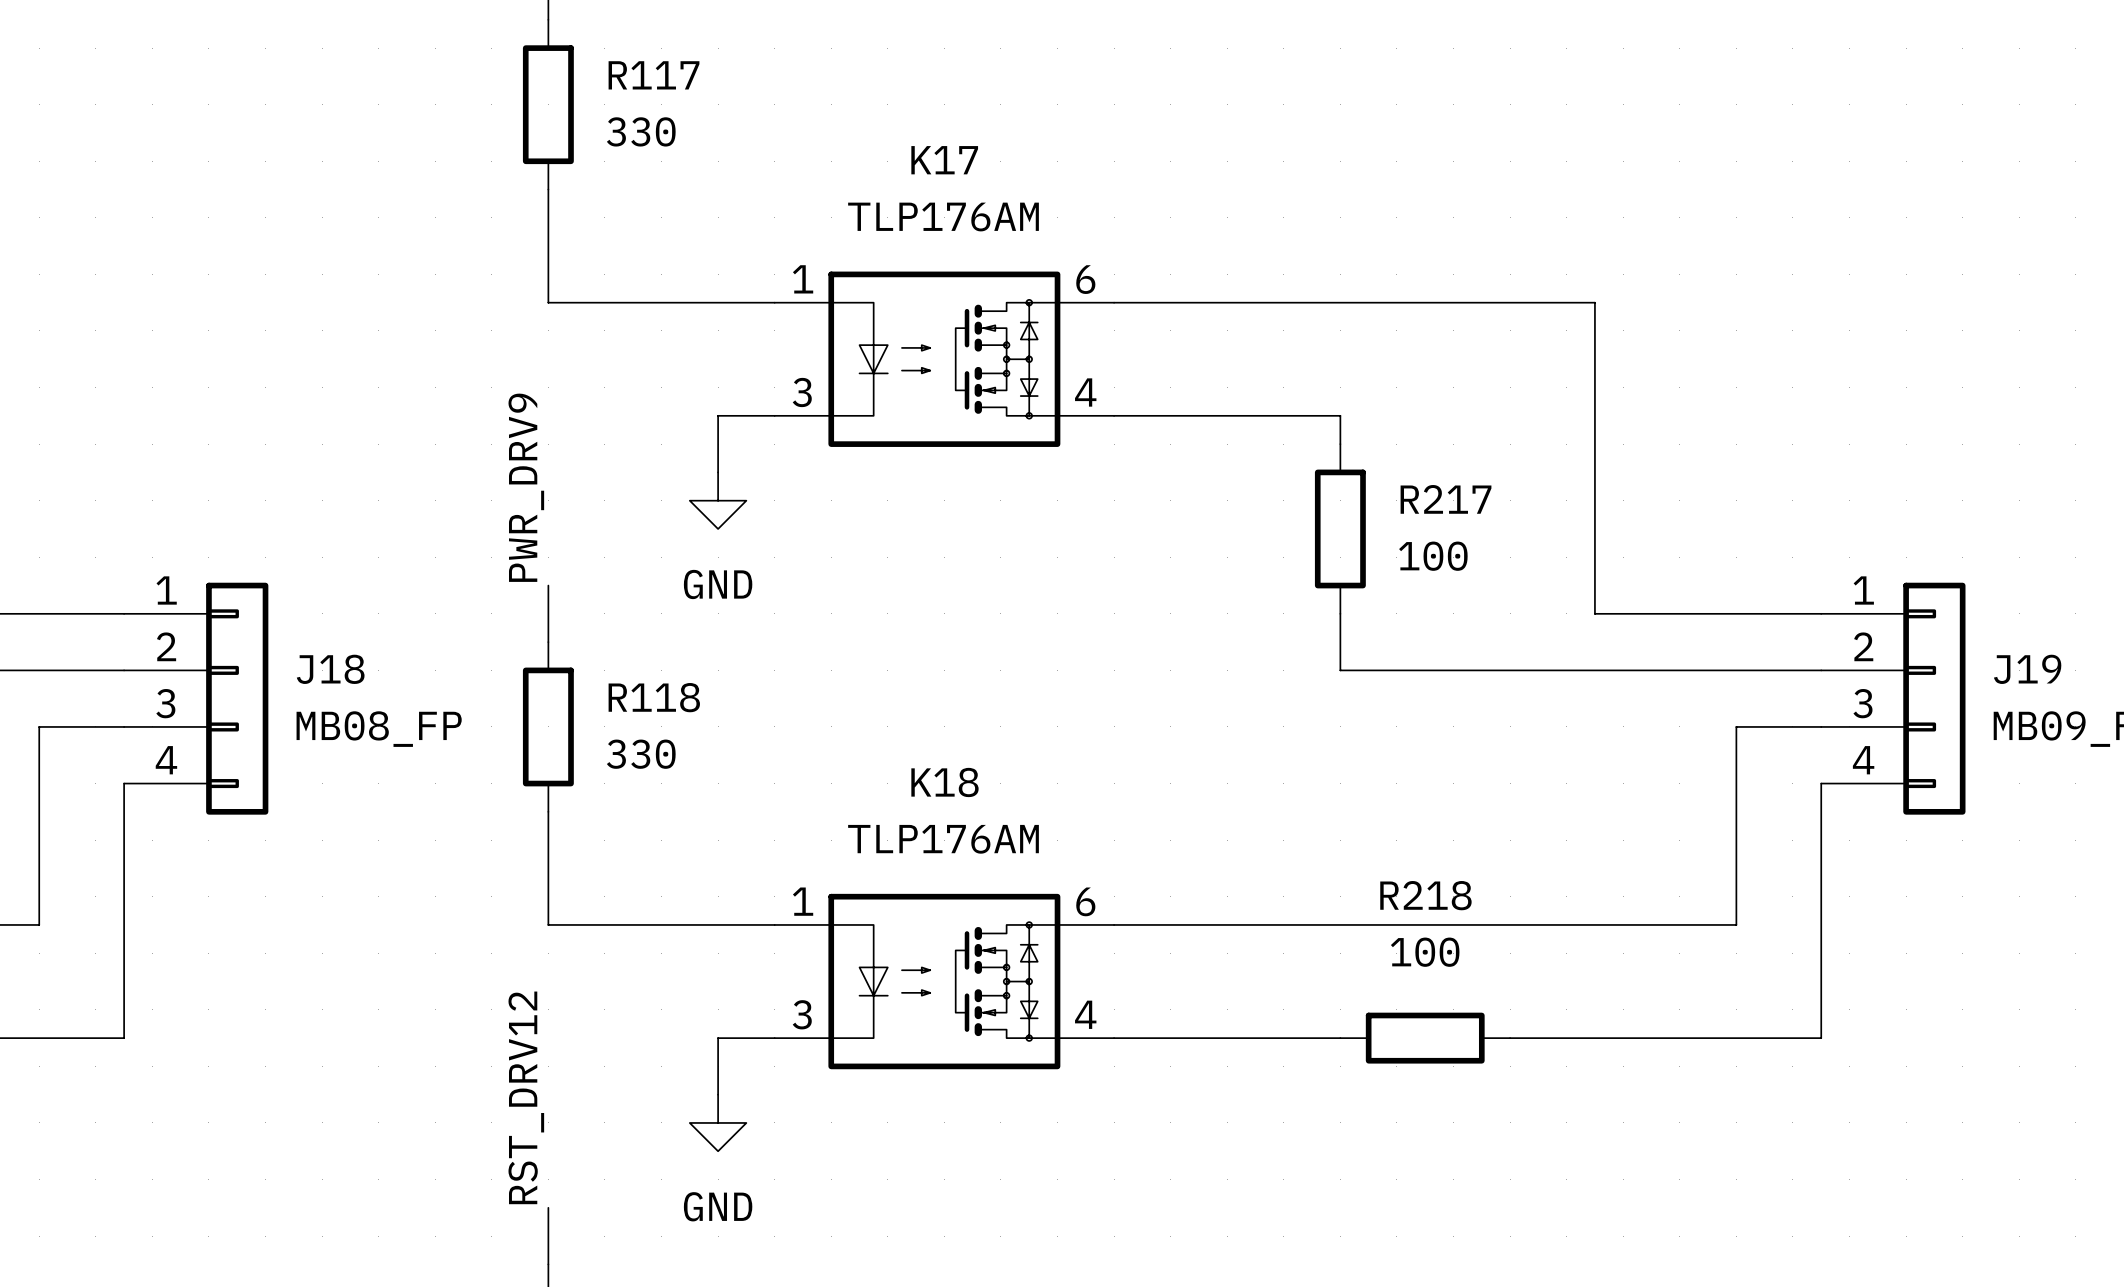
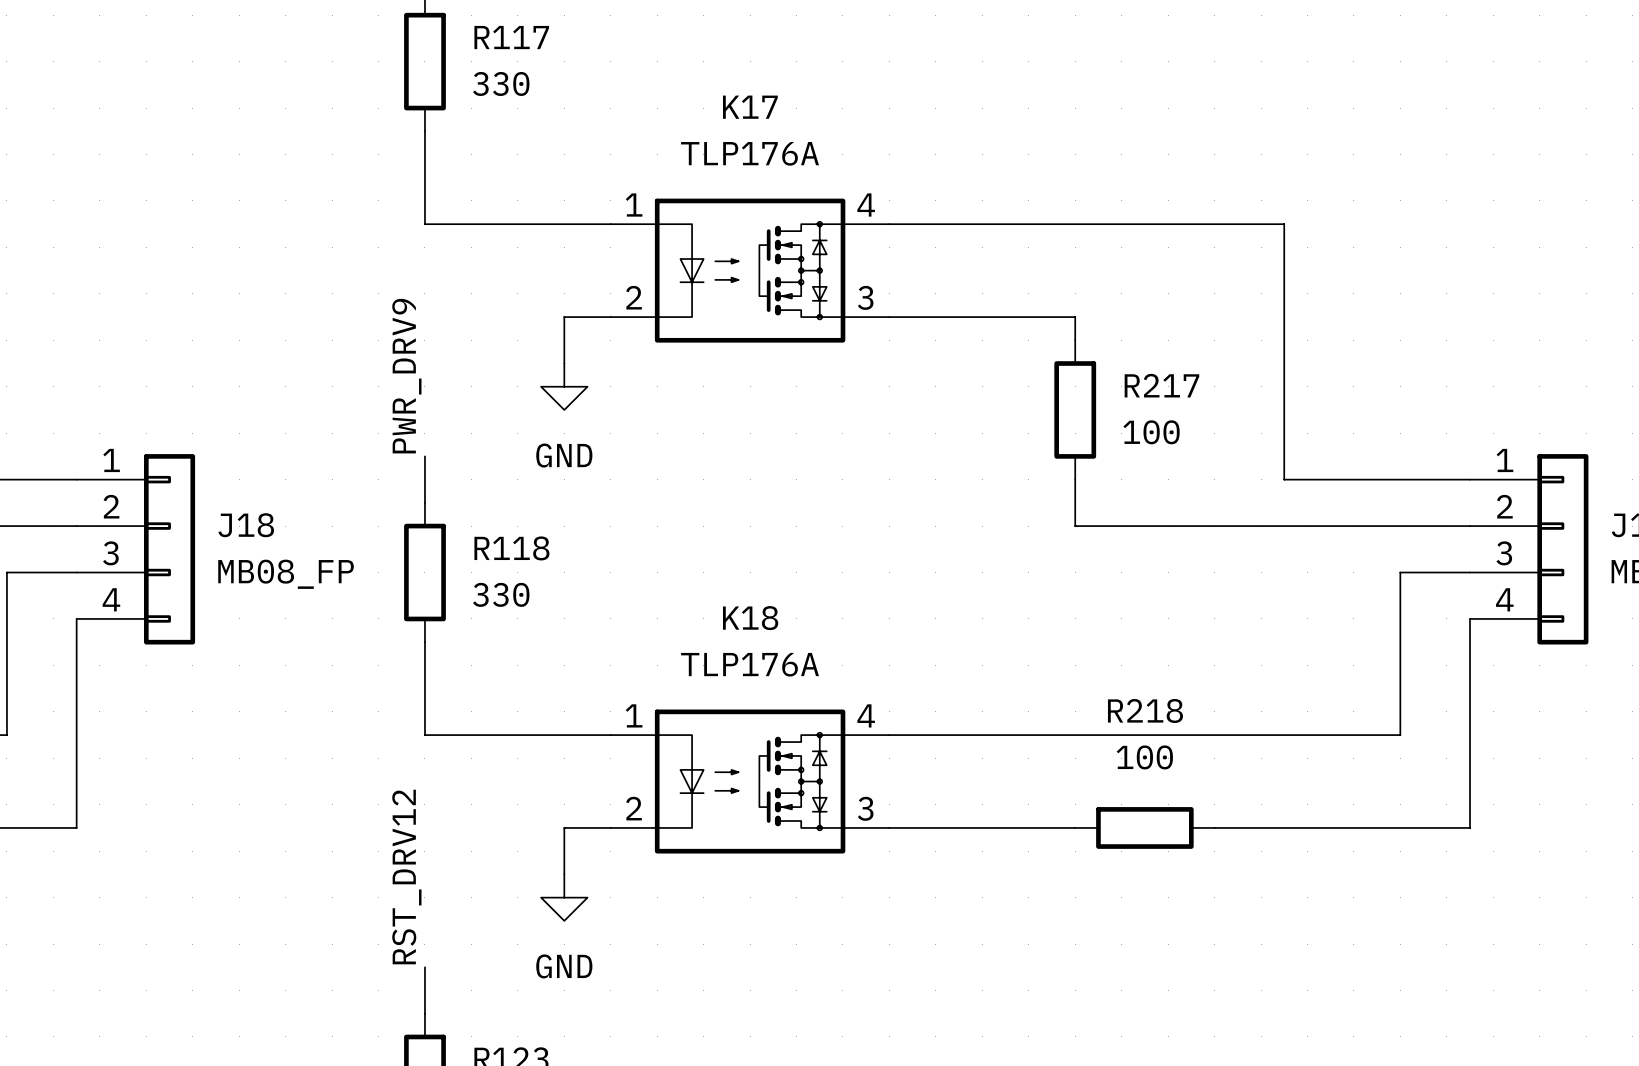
K17 value: TLP176AM (943, 217) -> TLP176A (750, 153)
K17 pin number: 6 (1085, 279) -> 4 (866, 205)
K17 pin number: 3 (802, 392) -> 2 (634, 297)
K17 pin number: 4 (1085, 392) -> 3 (865, 297)
K18 value: TLP176AM (943, 839) -> TLP176A (750, 664)
K18 pin number: 6 (1085, 901) -> 4 (866, 715)
K18 pin number: 3 (802, 1014) -> 2 (634, 808)
K18 pin number: 4 (1085, 1014) -> 3 (865, 808)

